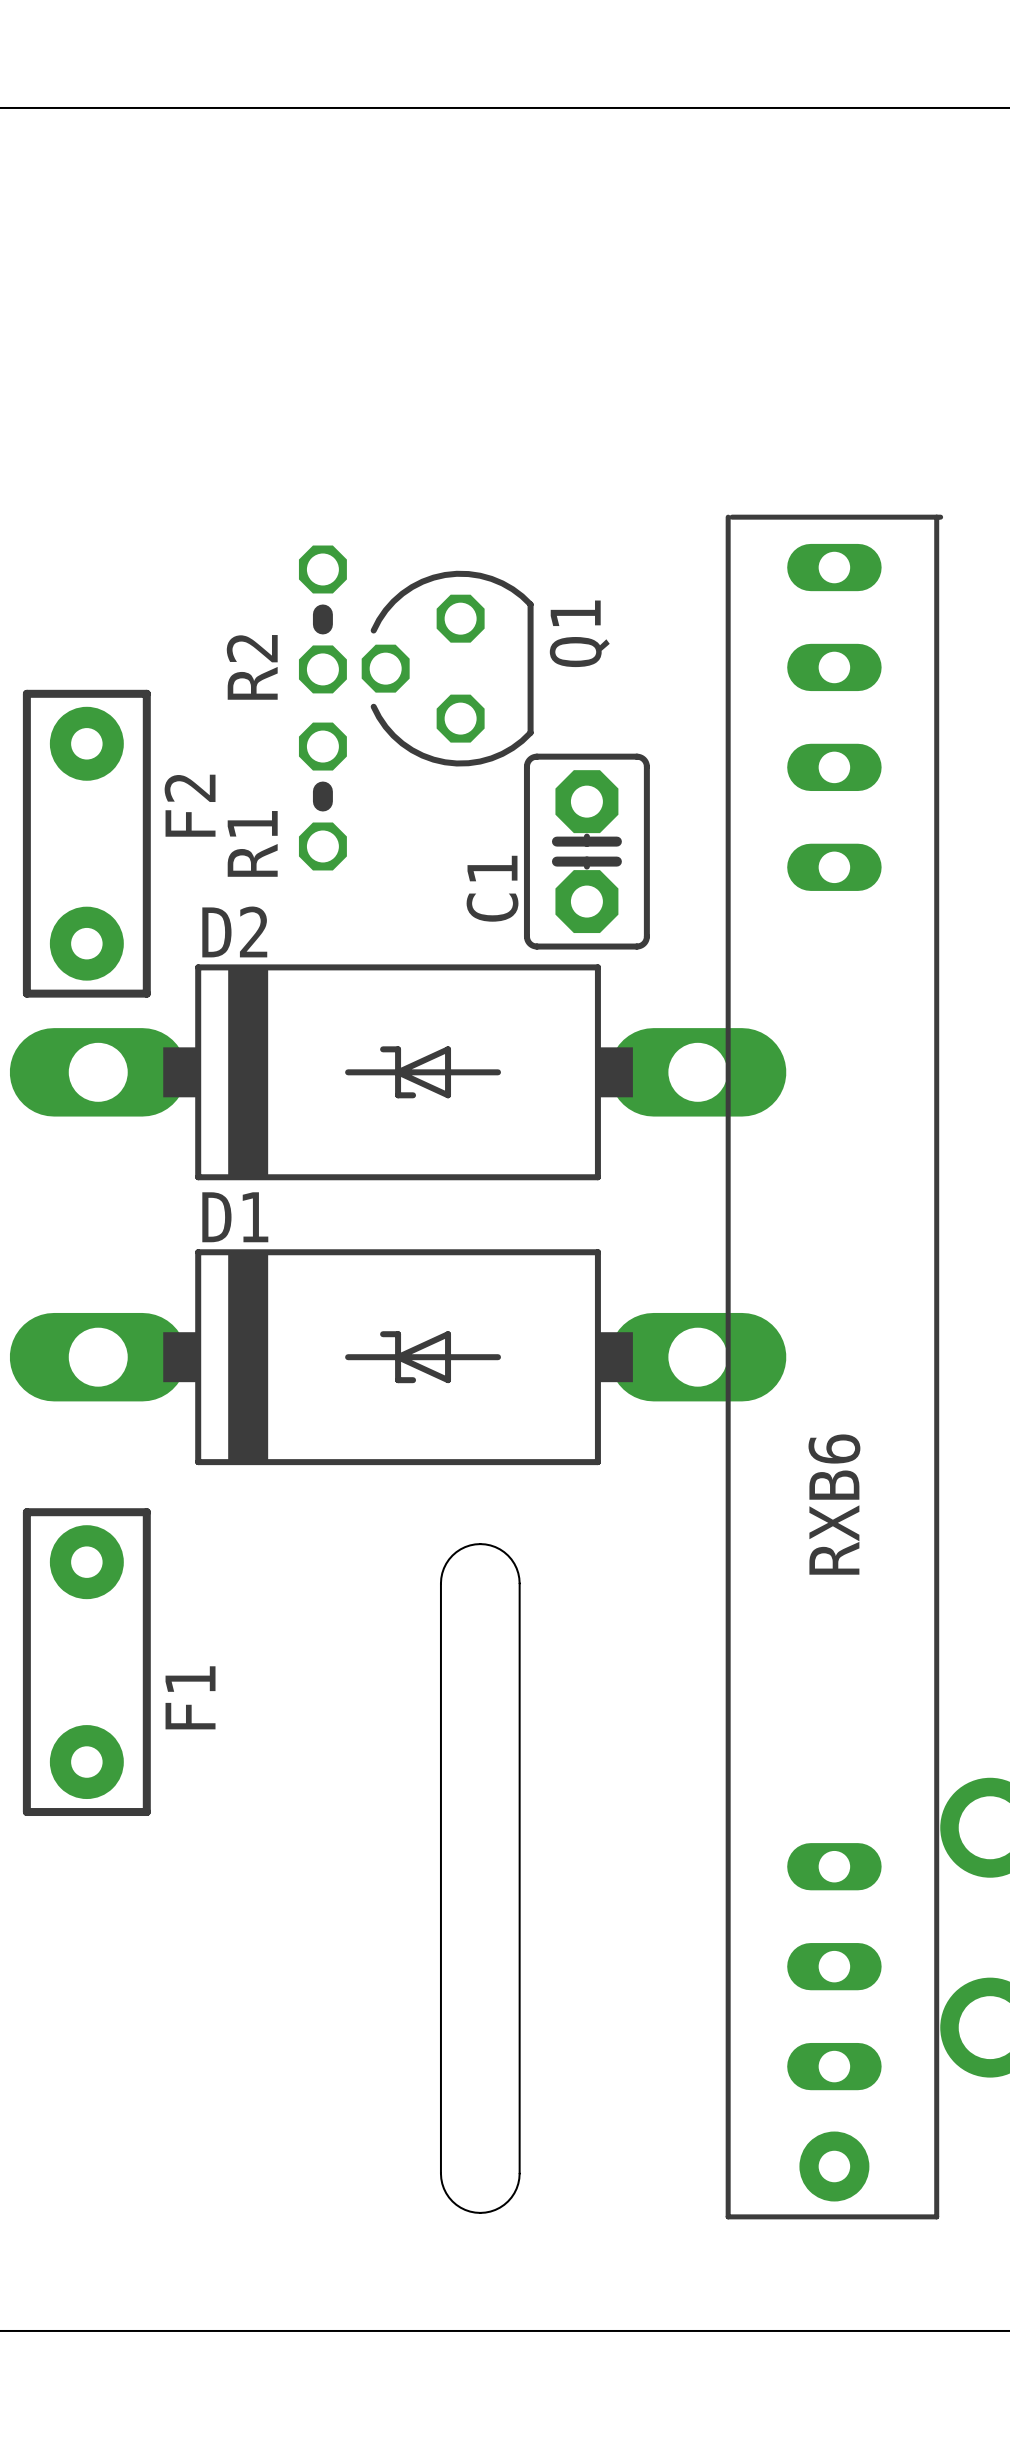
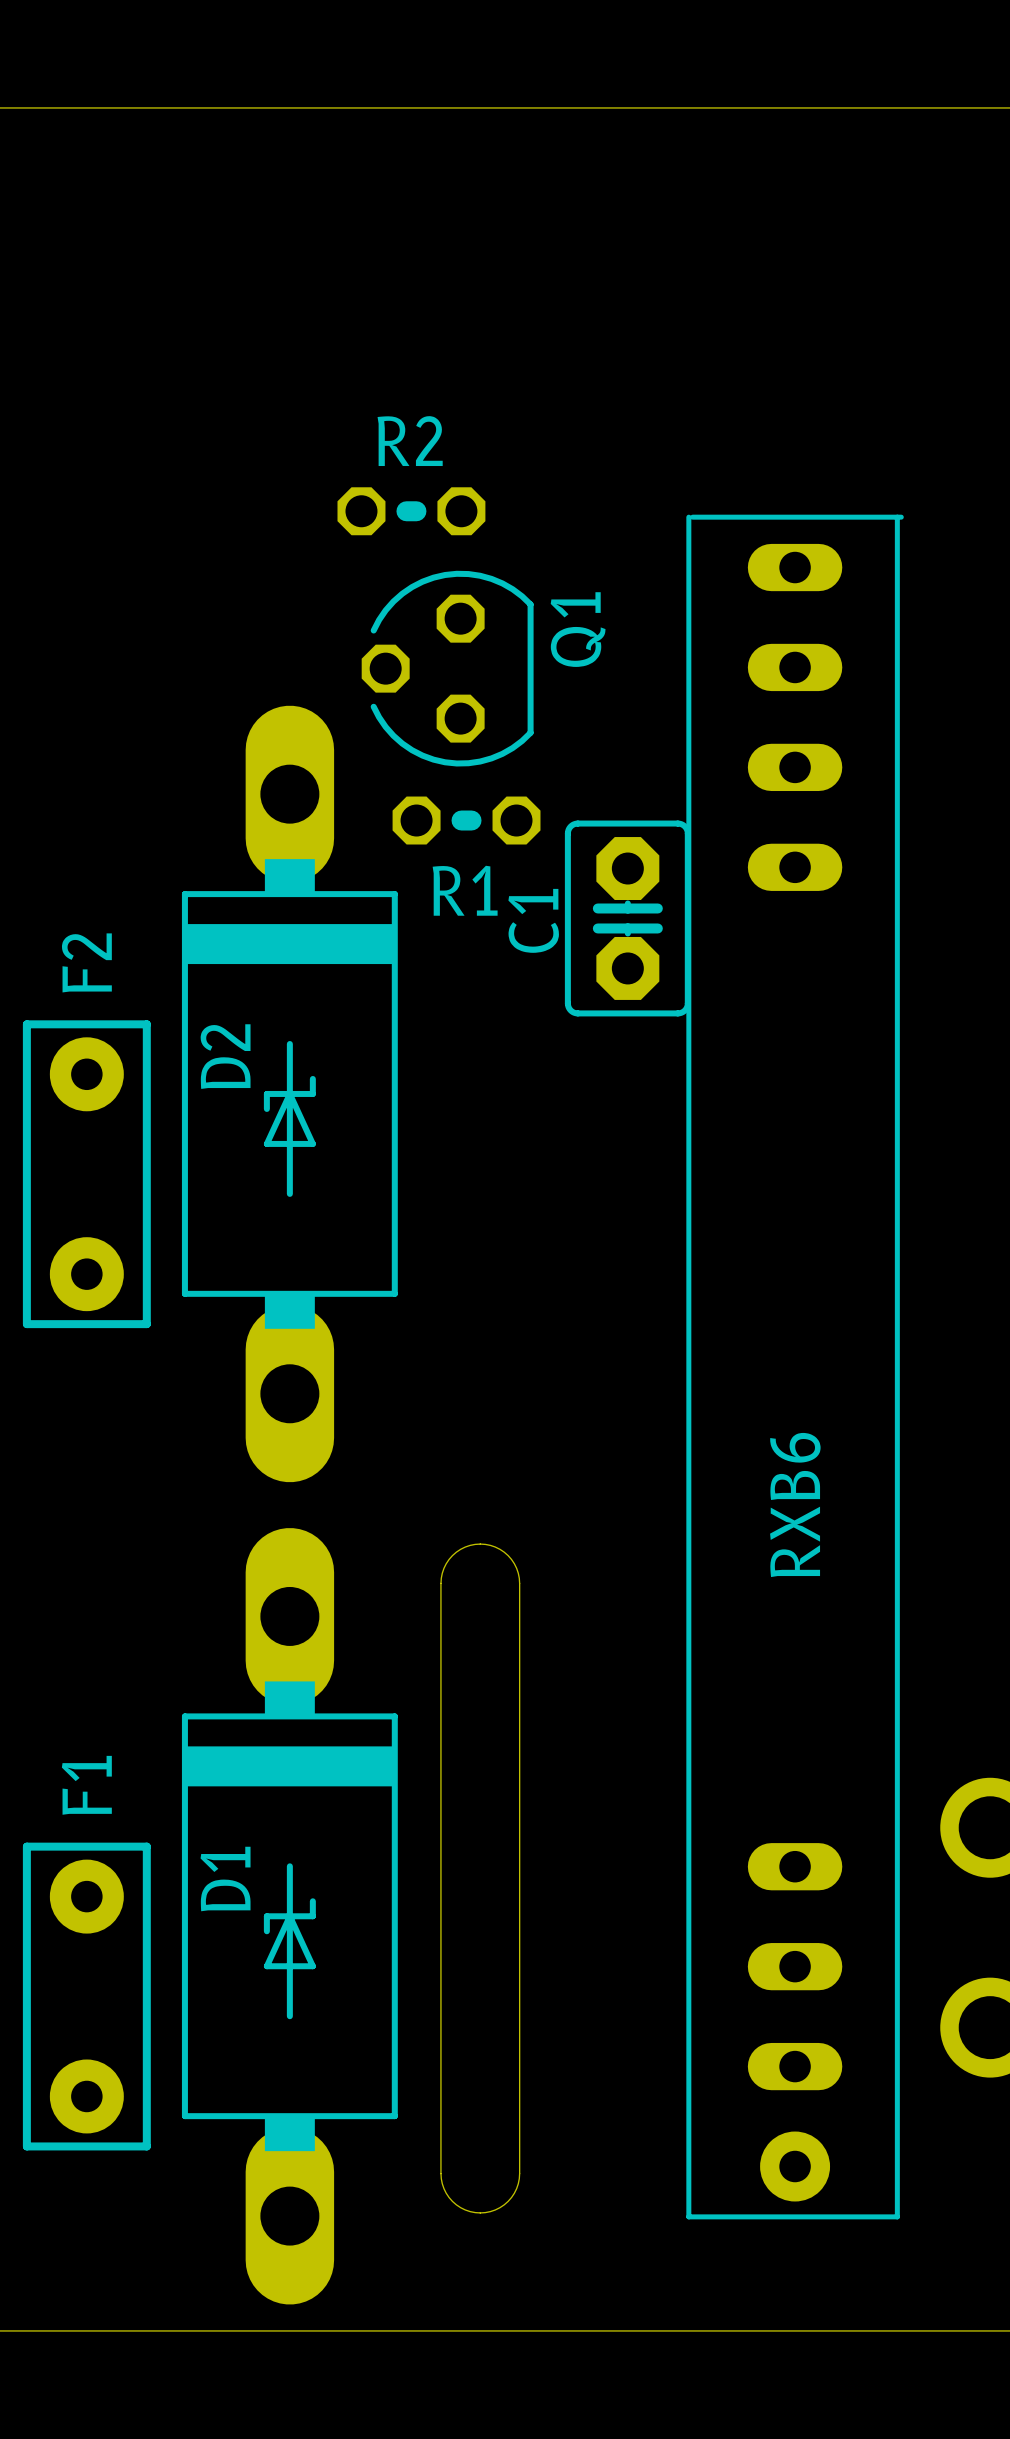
R2 rotation: 0° (322, 619) -> 90° clockwise (411, 511)
R2 position: (322, 619) -> (411, 511)
R1 rotation: 0° (322, 796) -> 90° clockwise (466, 820)
R1 position: (322, 796) -> (466, 820)
F2 name position: F2 (190, 805) -> F2 (86, 962)
F2 position: (86, 843) -> (86, 1174)
R1 name position: R1 (252, 843) -> R1 (465, 890)
C1 position: (586, 851) -> (627, 918)
C1 name position: C1 (492, 888) -> C1 (533, 920)
D2 name position: D2 (234, 931) -> D2 (225, 1056)
D2 rotation: 0° (398, 1072) -> 90° clockwise (289, 1093)
D1 name position: D1 (235, 1217) -> D1 (225, 1878)
D1 rotation: 0° (398, 1357) -> 90° clockwise (289, 1916)
D1 position: (398, 1357) -> (289, 1916)
RXB6 position: (834, 1367) -> (795, 1367)
F1 position: (86, 1662) -> (86, 1996)
F1 name position: F1 (190, 1697) -> F1 (86, 1785)

